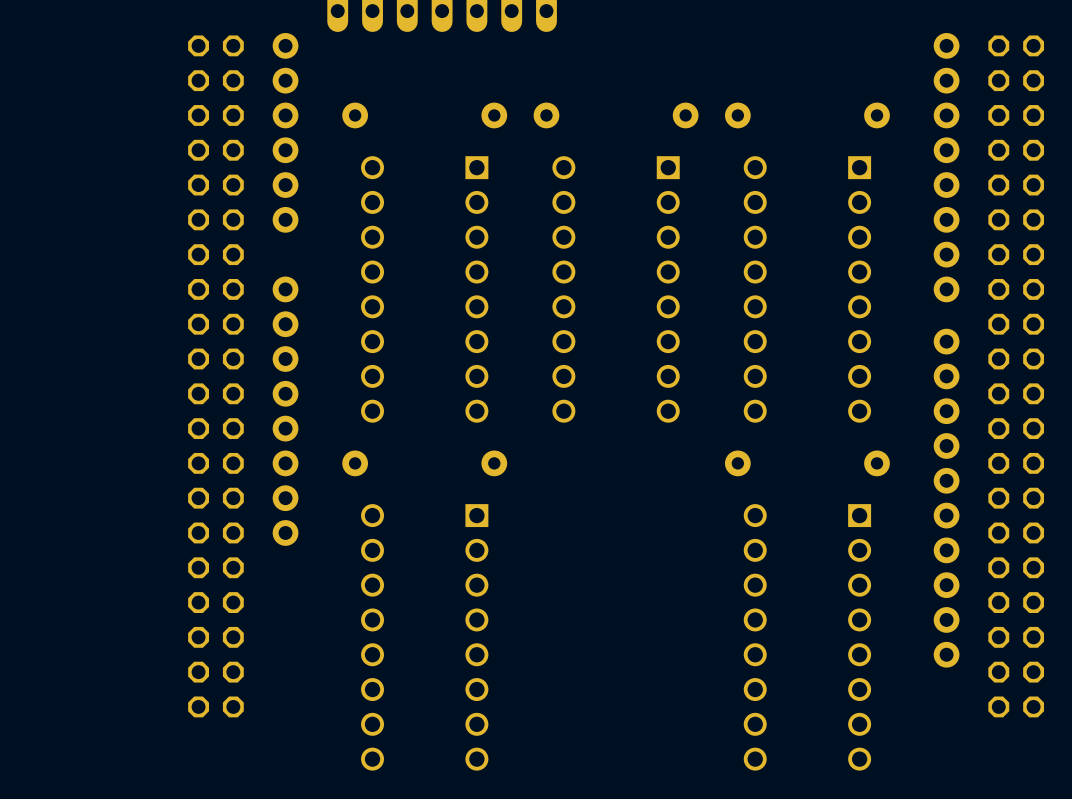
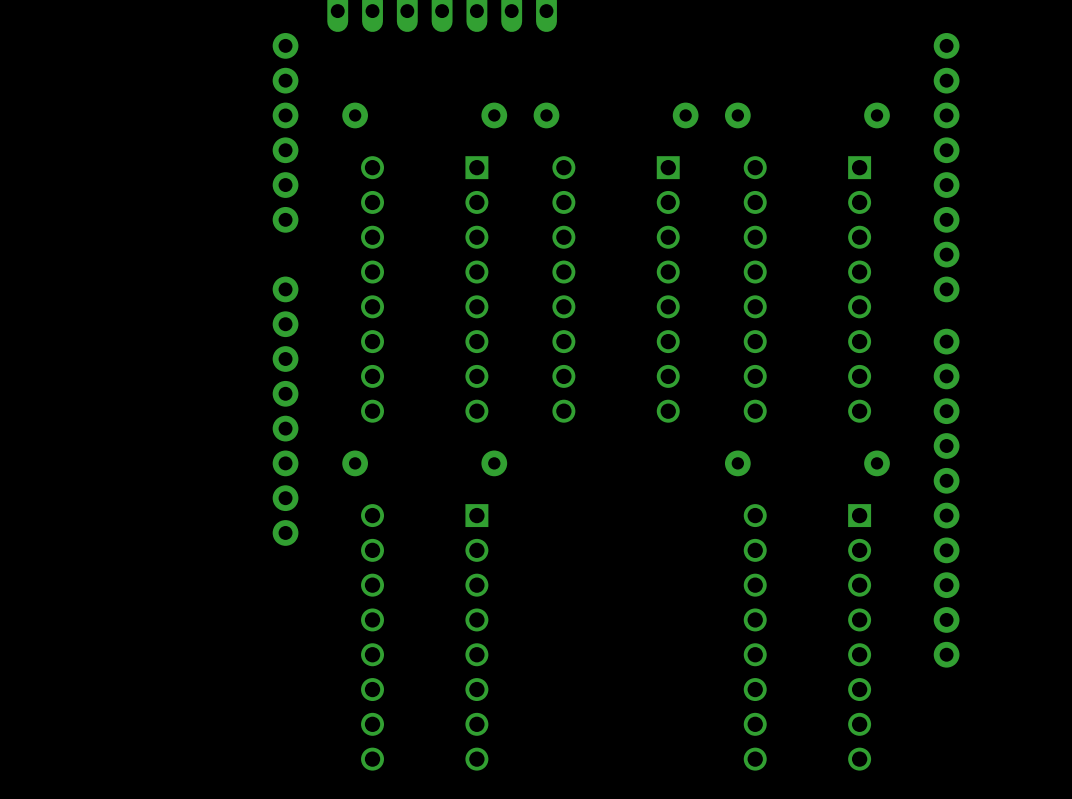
part: (215, 376) -> none
part: (1016, 376) -> none

